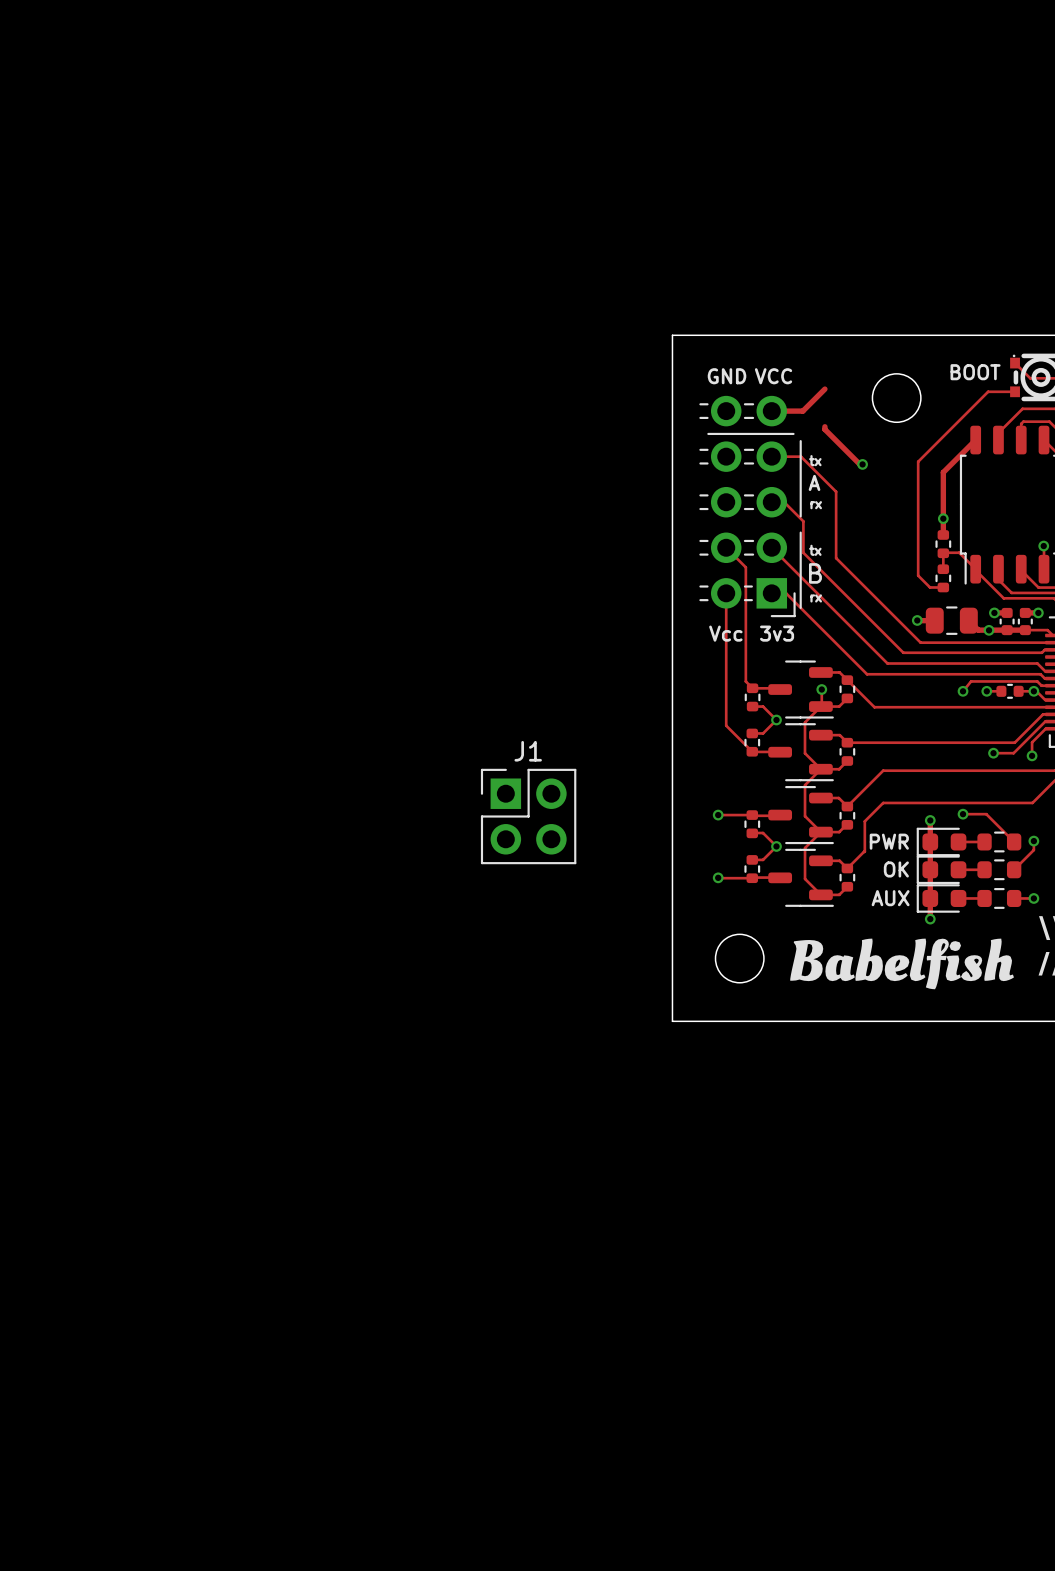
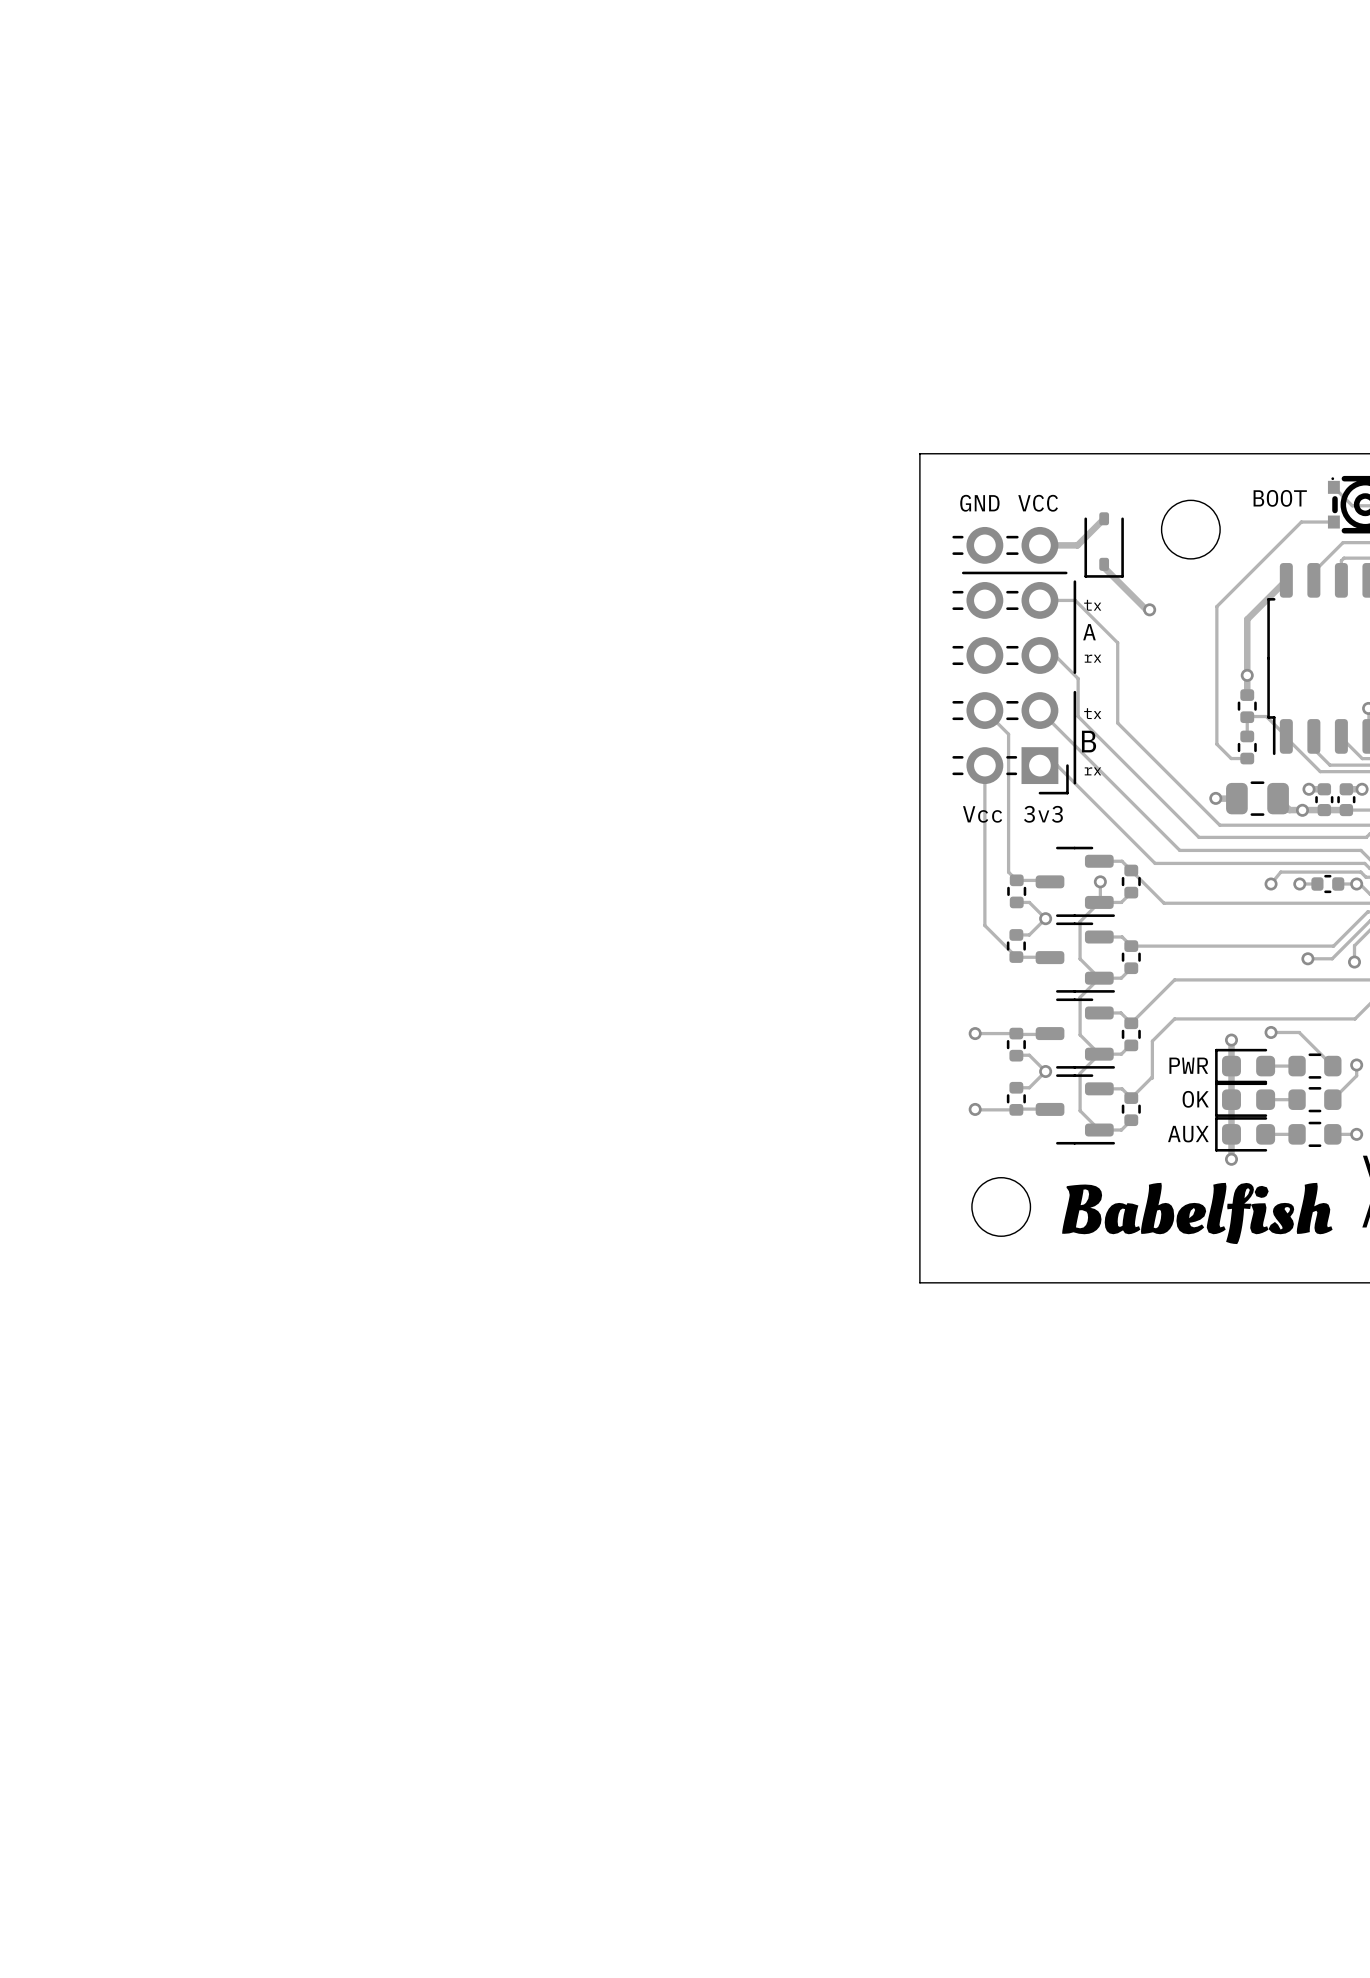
part: none -> (1104, 545)
J1: (528, 816) -> none

